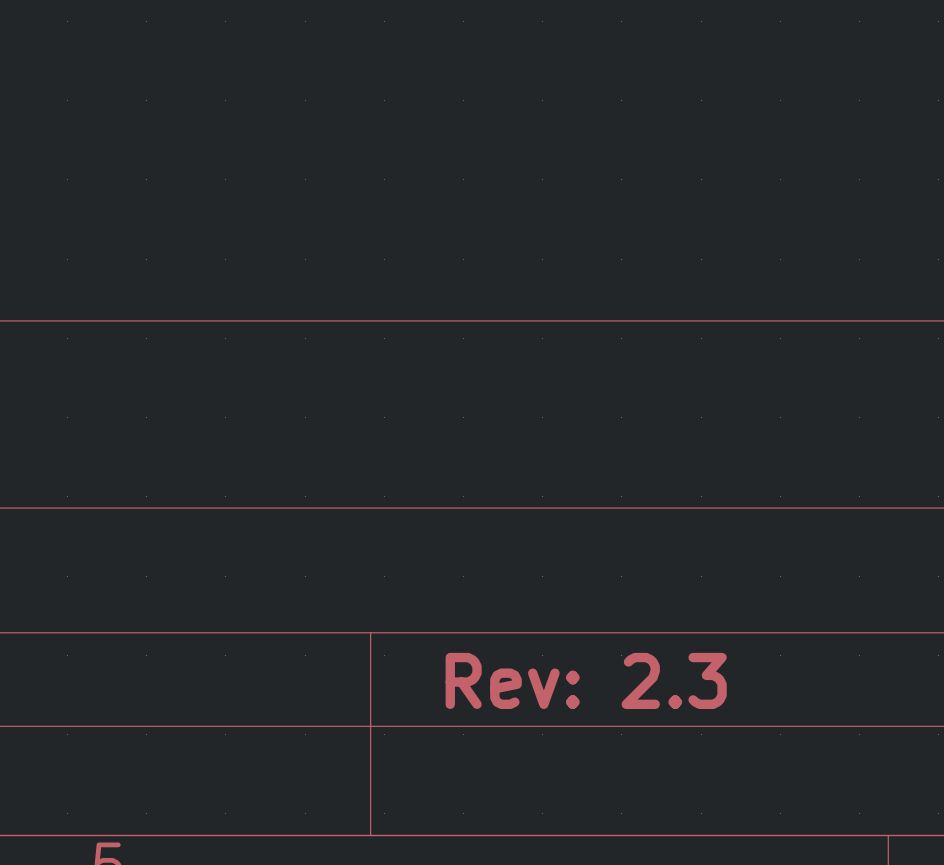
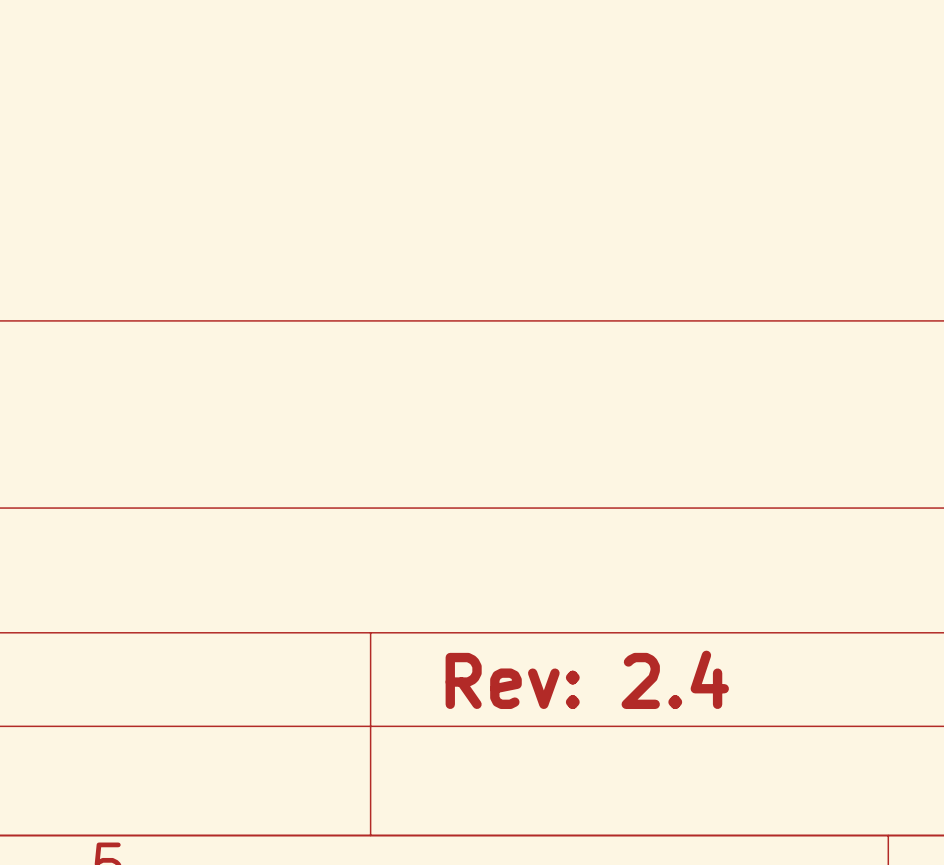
title block: Rev: 2.3 (586, 680) -> Rev: 2.4 (587, 679)

